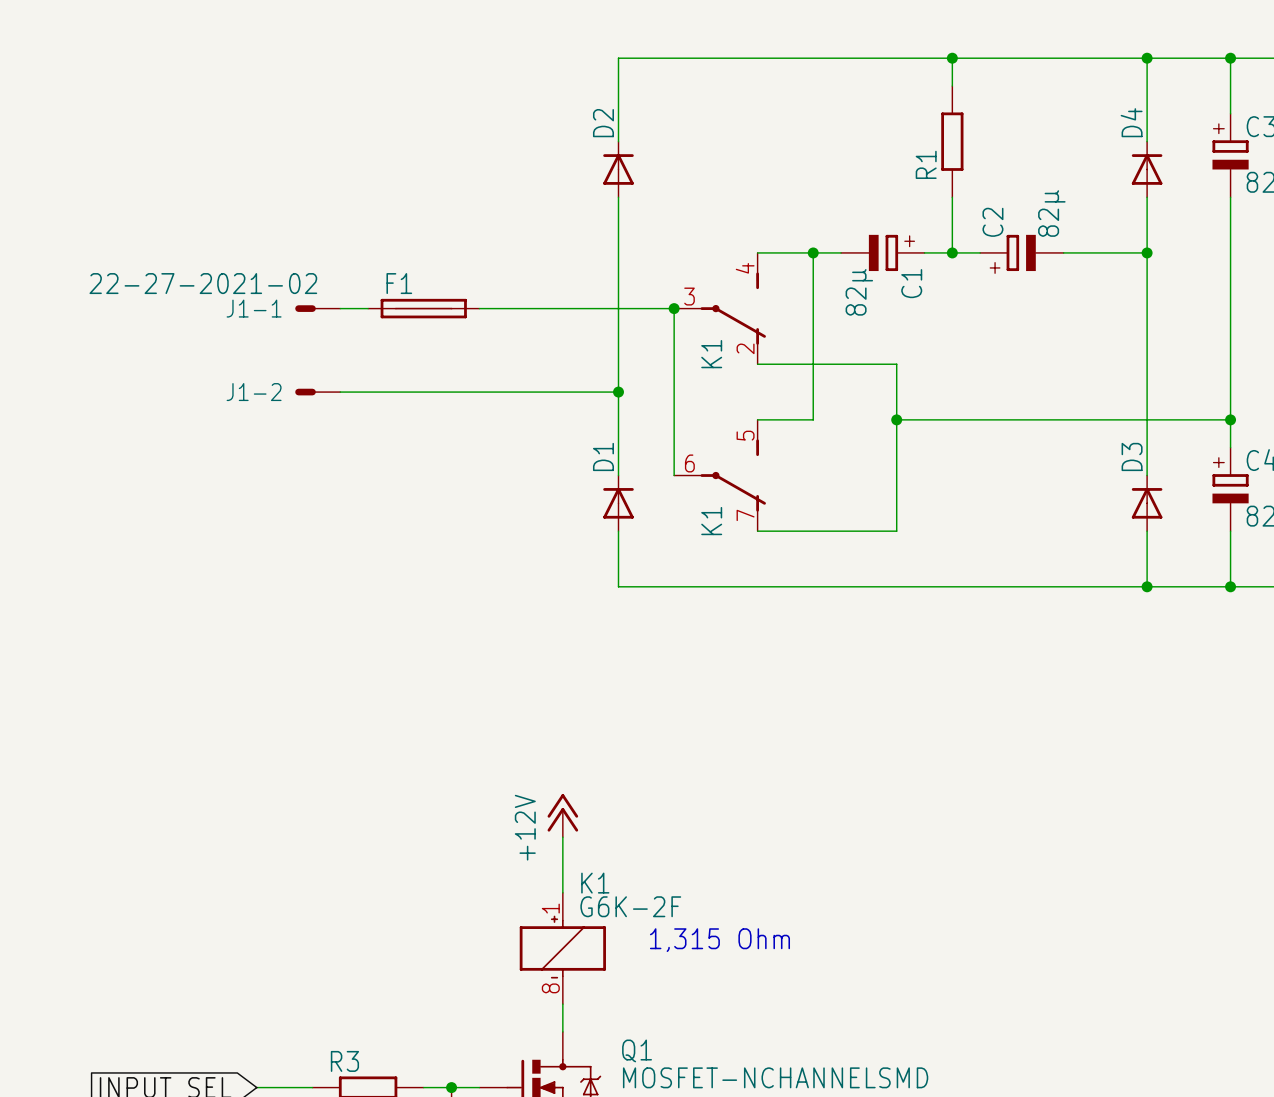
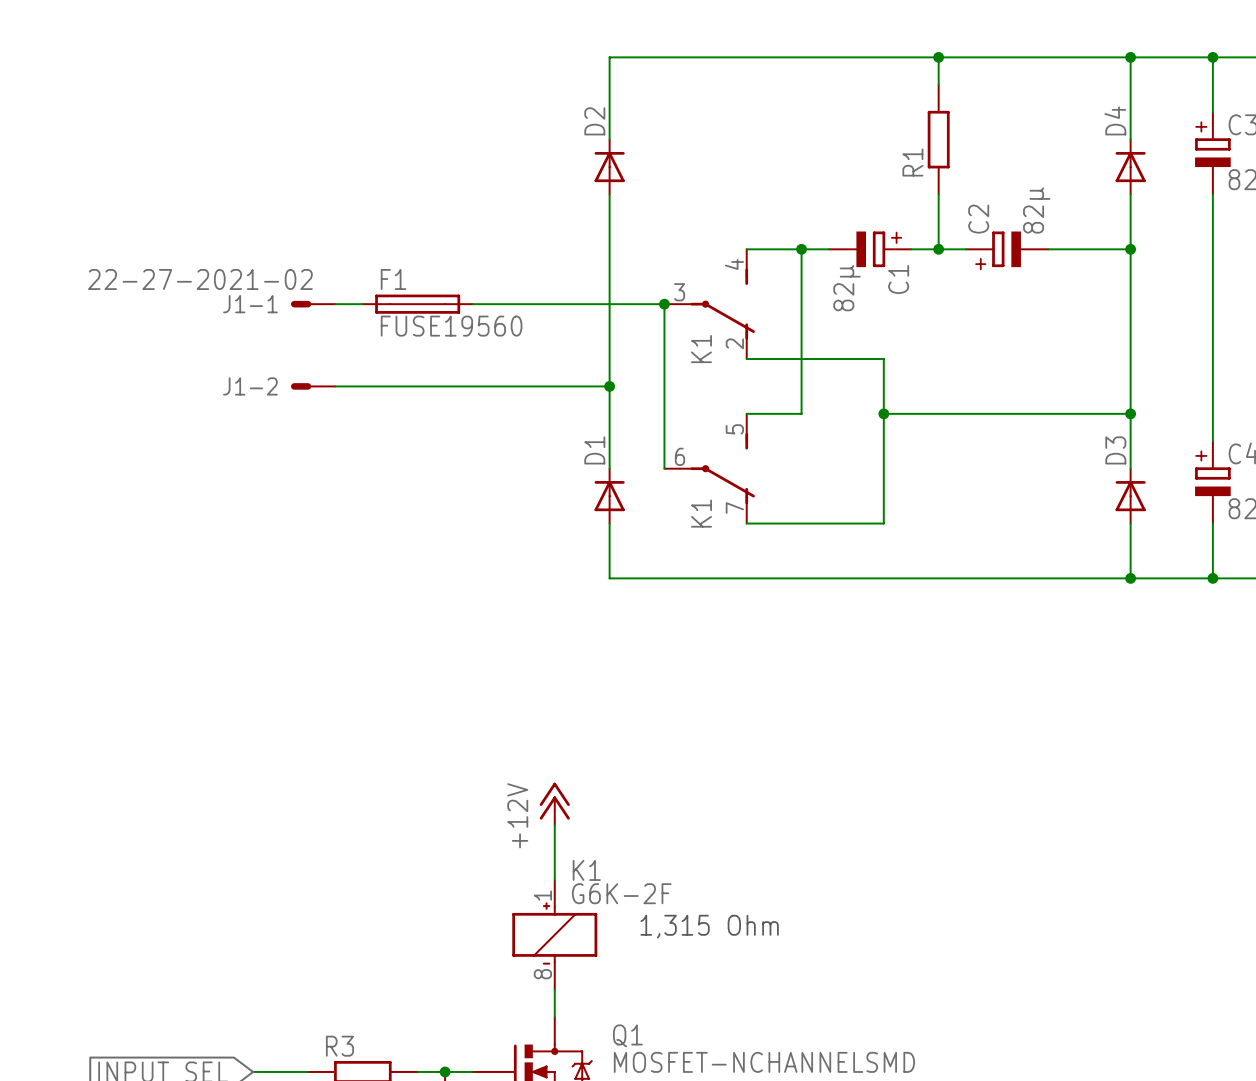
F1 value: none -> FUSE19560 (451, 326)
wire: (1147, 419) (1230, 419) -> none
junction: none -> (1130, 413)
junction: (1230, 419) -> none

